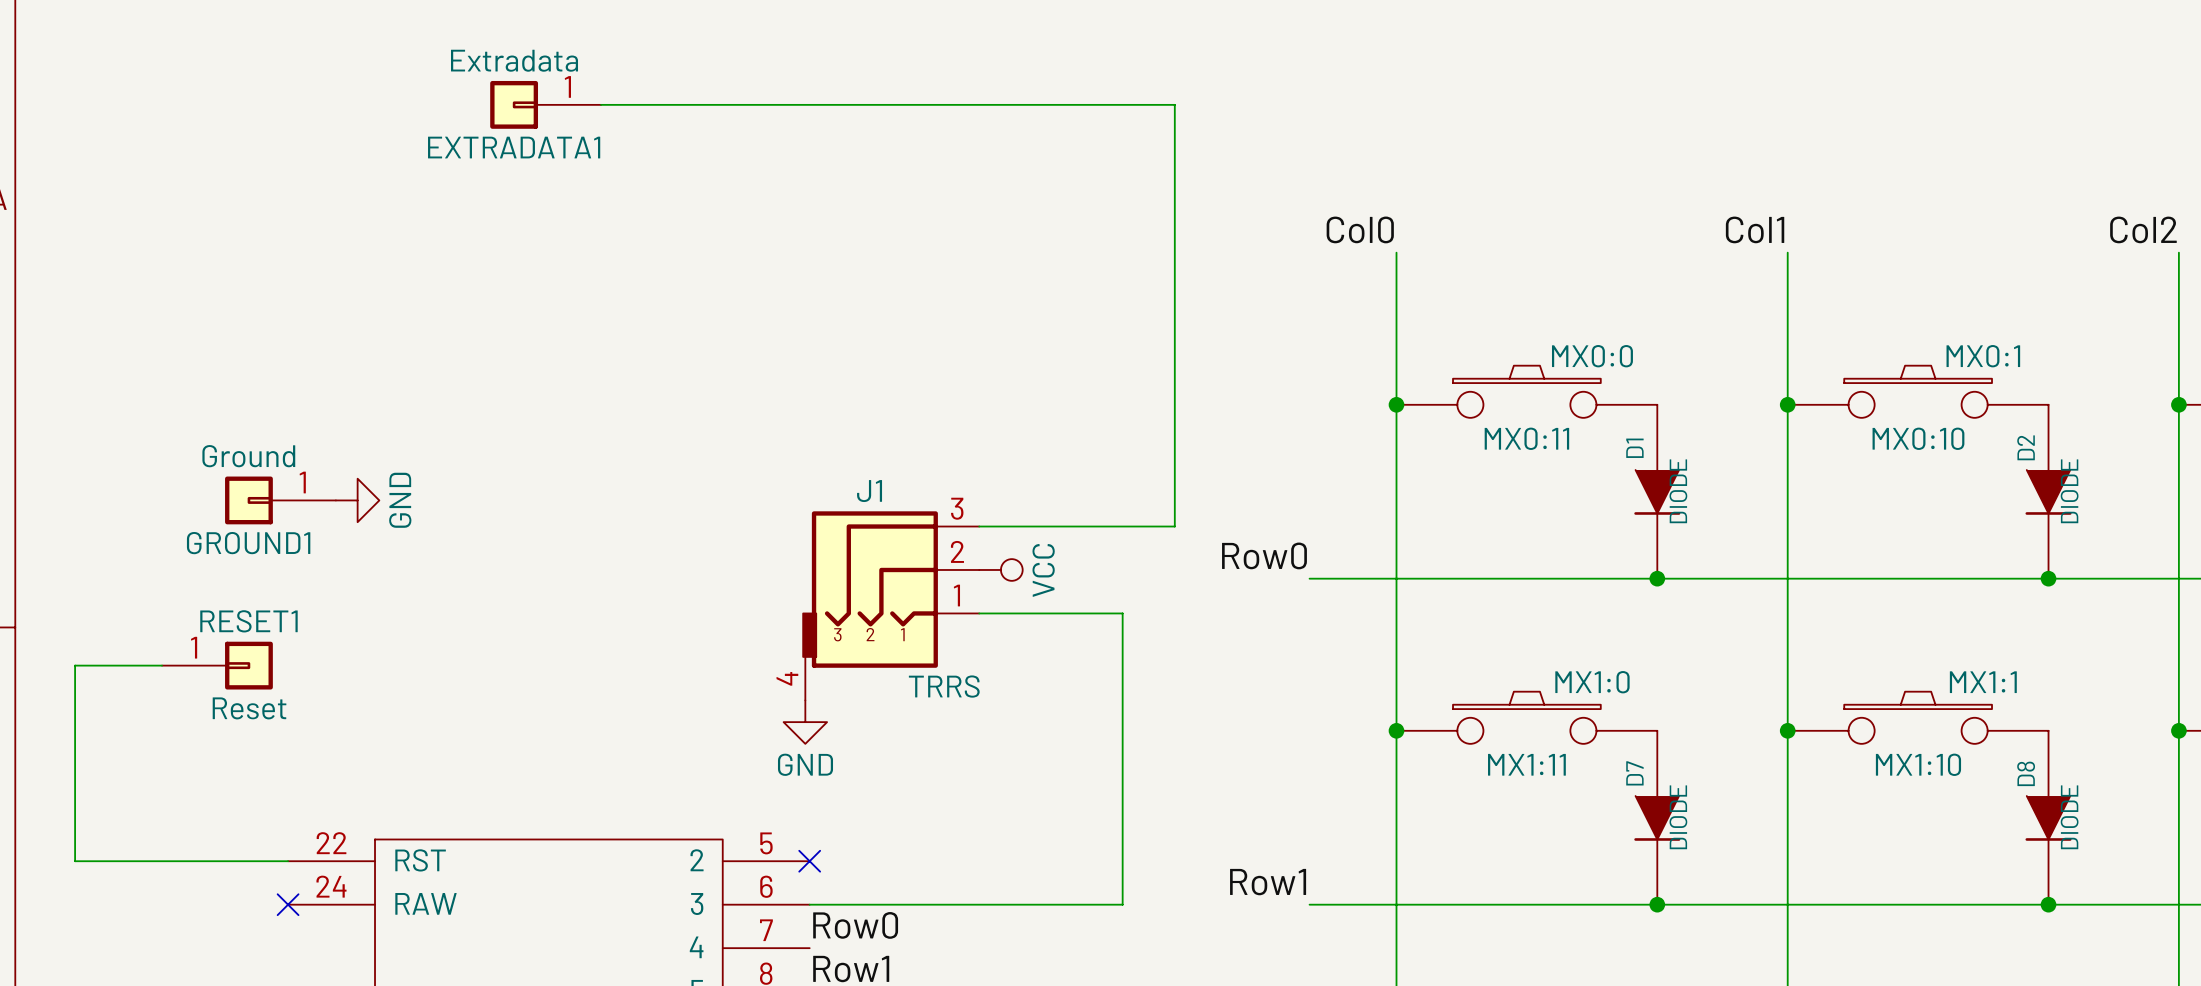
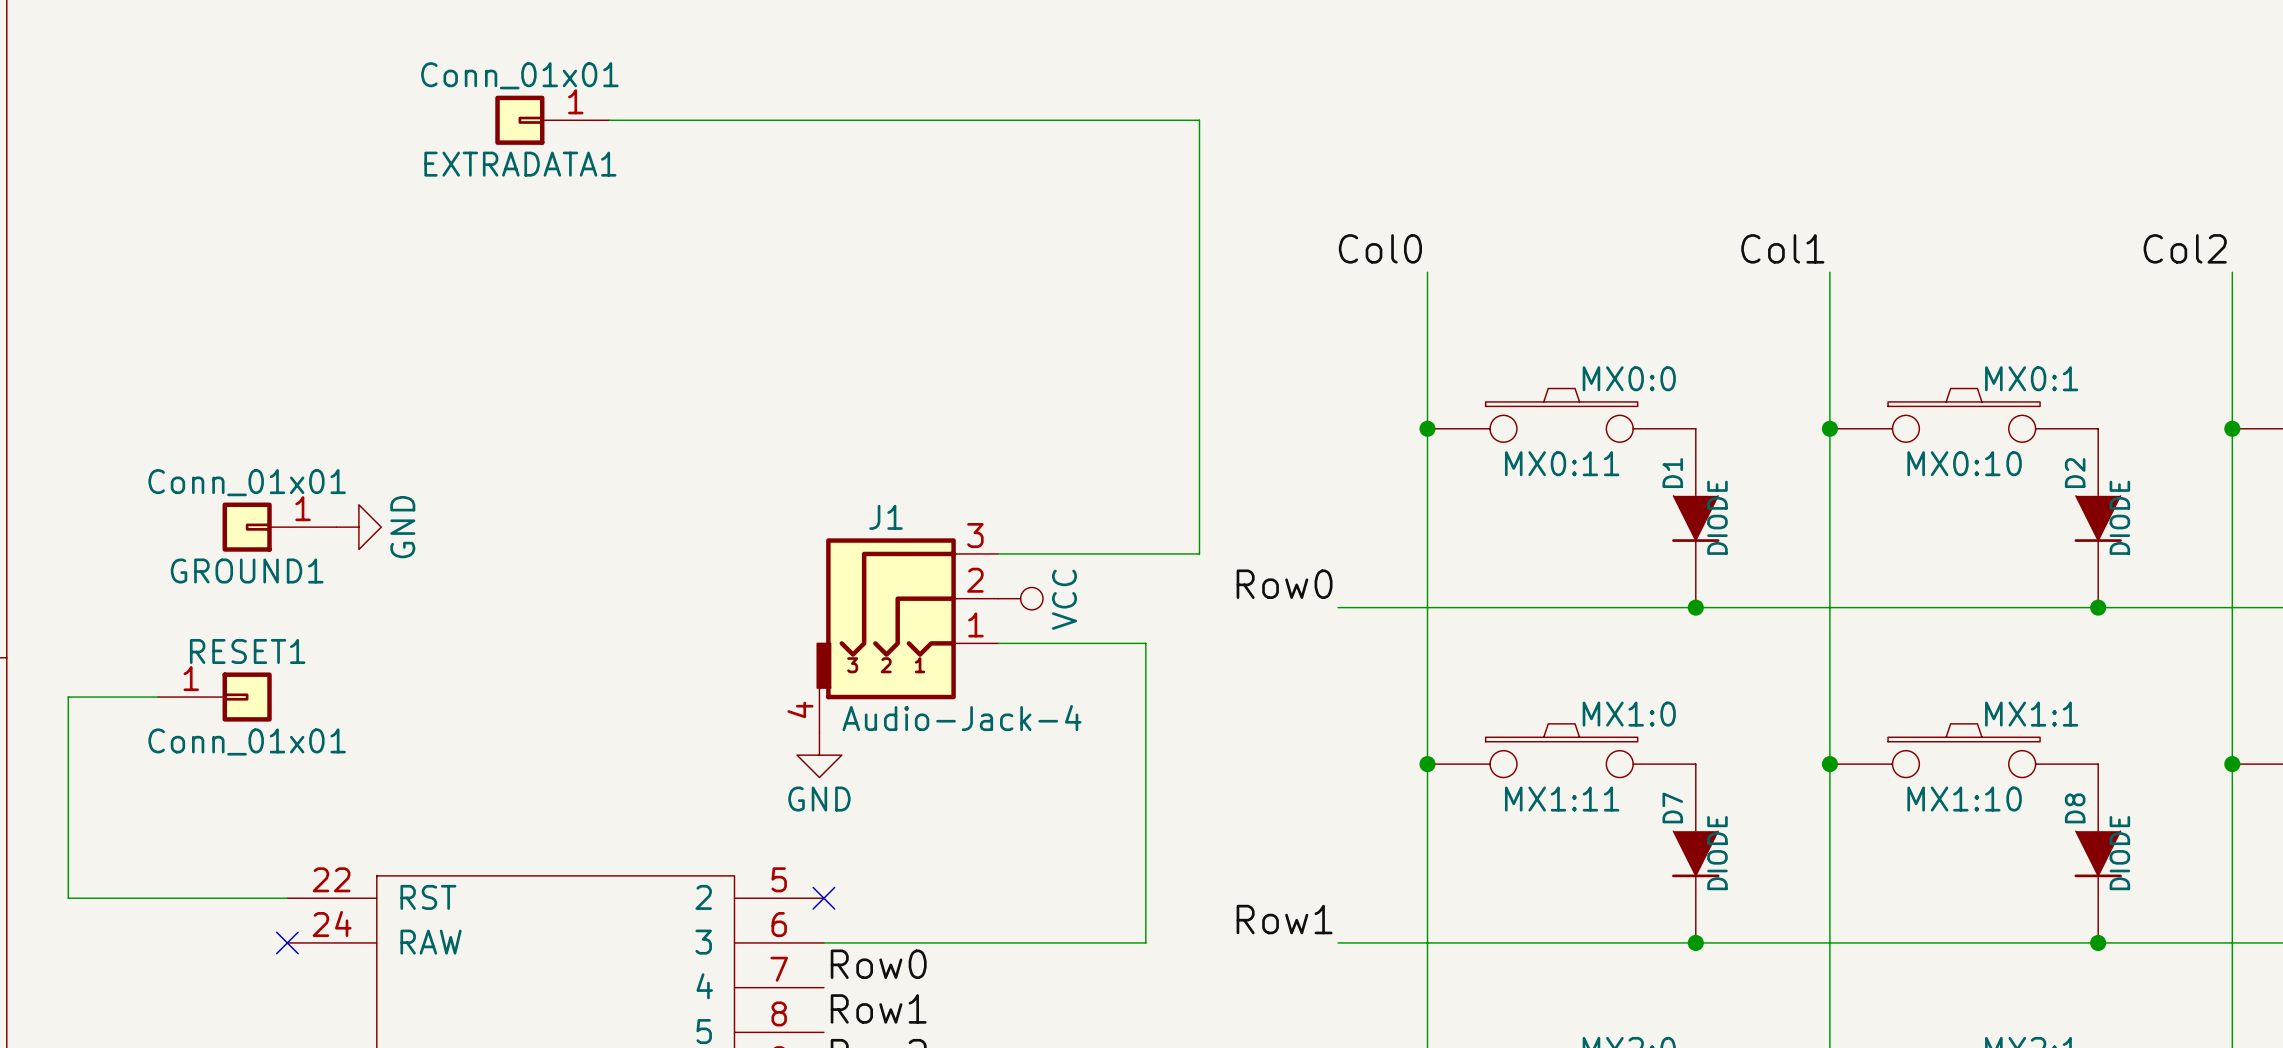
EXTRADATA1 value: Extradata (514, 60) -> Conn_01x01 (519, 75)
GROUND1 value: Ground (248, 456) -> Conn_01x01 (247, 482)
J1 value: TRRS (944, 686) -> Audio-Jack-4 (961, 718)
RESET1 value: Reset (249, 708) -> Conn_01x01 (247, 741)

